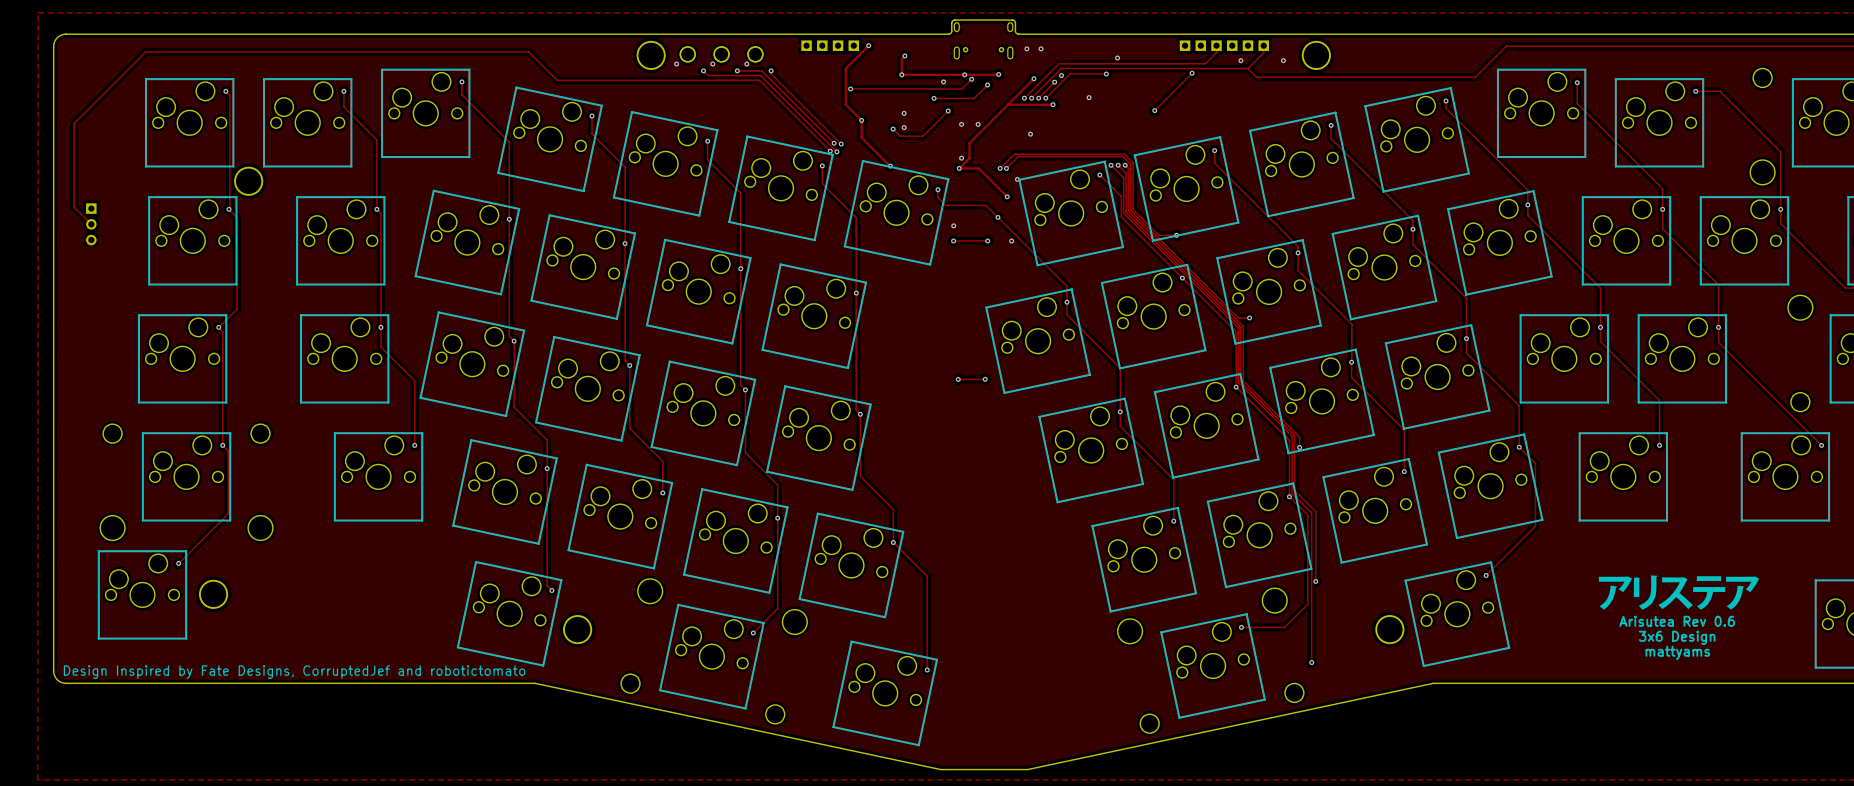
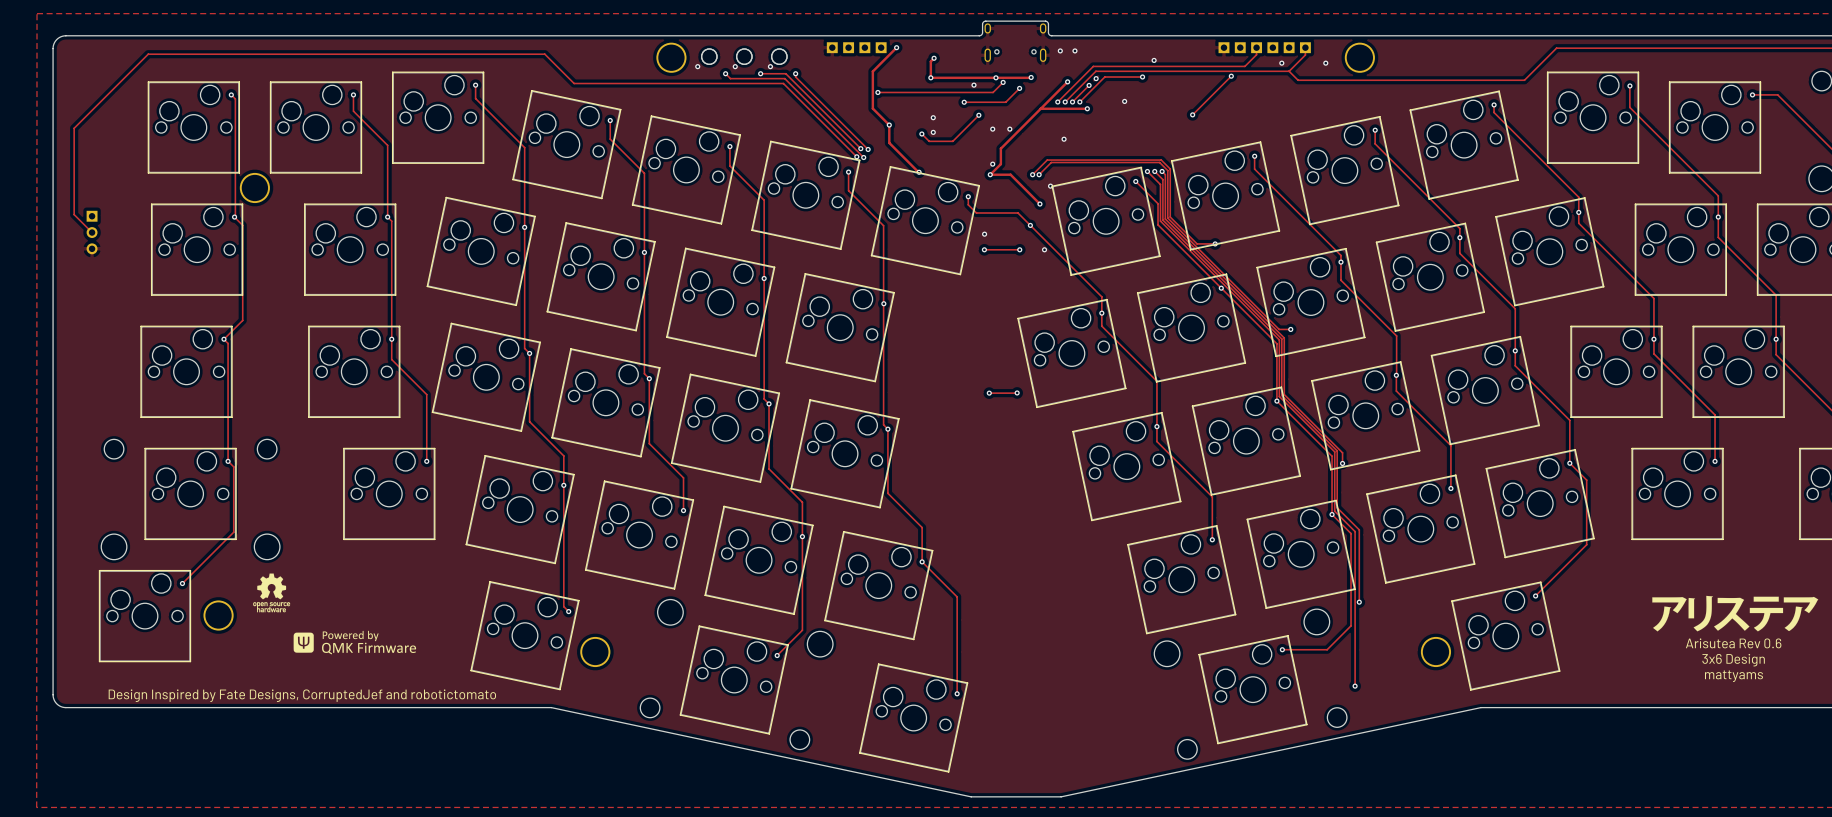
drawing: none -> [253, 573, 291, 613]
drawing: none -> [293, 630, 417, 655]

